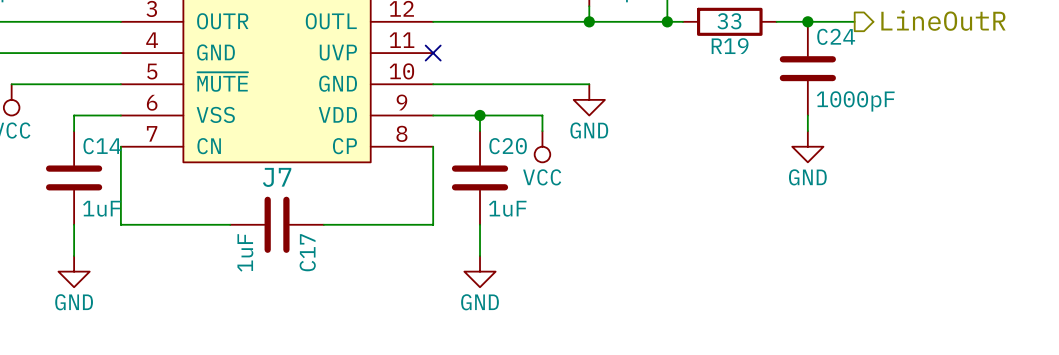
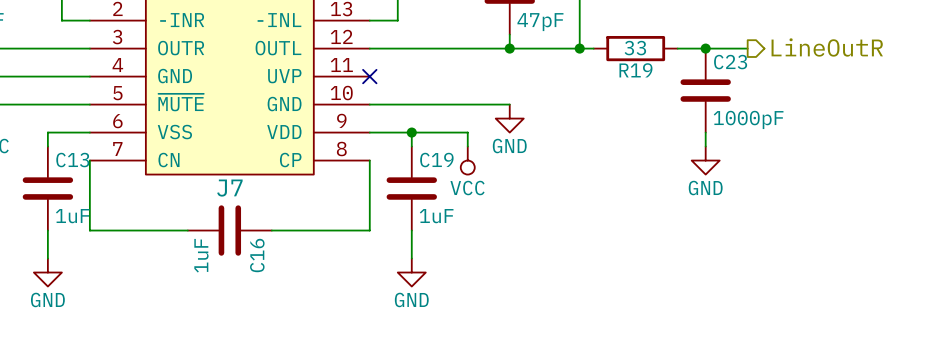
C24 name: C24 (836, 36) -> C23 (730, 62)
C14 name: C14 (102, 146) -> C13 (72, 160)
C20 name: C20 (508, 146) -> C19 (436, 160)
C17 name: C17 (307, 252) -> C16 (257, 255)

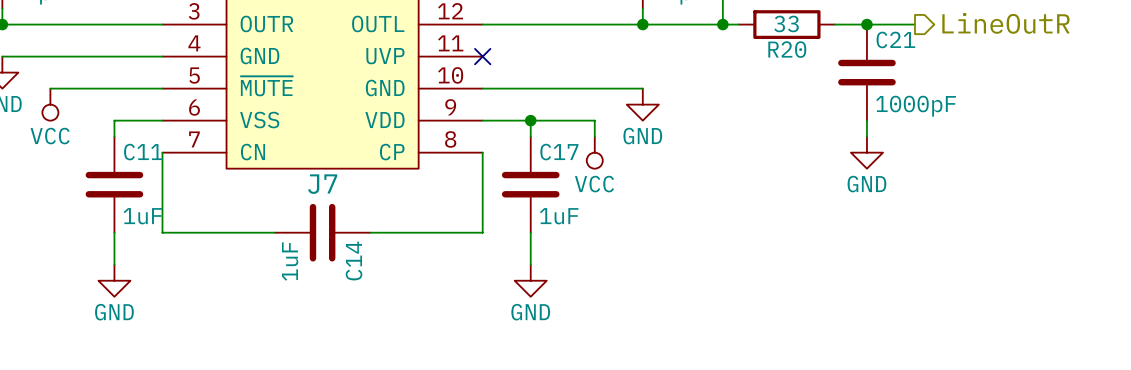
C23 name: C23 (730, 62) -> C21 (895, 39)
R19 name: R19 (635, 70) -> R20 (787, 49)
C13 name: C13 (72, 160) -> C11 (143, 152)
C19 name: C19 (436, 160) -> C17 (559, 152)
C16 name: C16 (257, 255) -> C14 (354, 260)

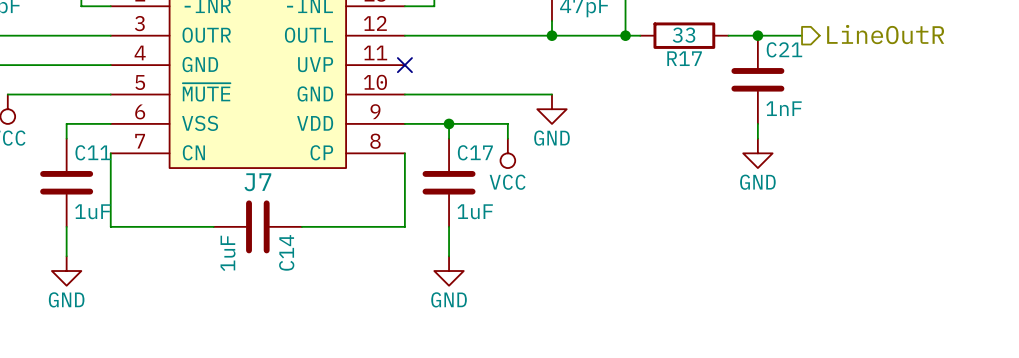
R20 name: R20 (787, 49) -> R17 (684, 58)
C21 value: 1000pF (916, 106) -> 1nF (784, 108)

